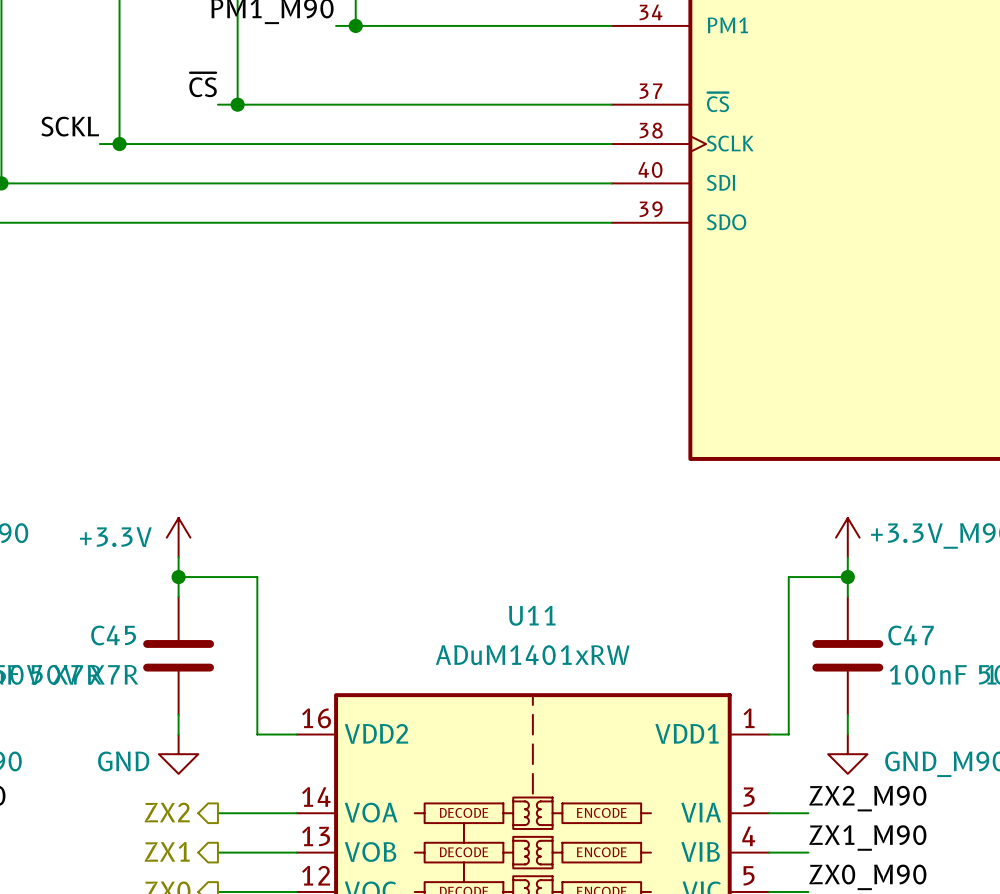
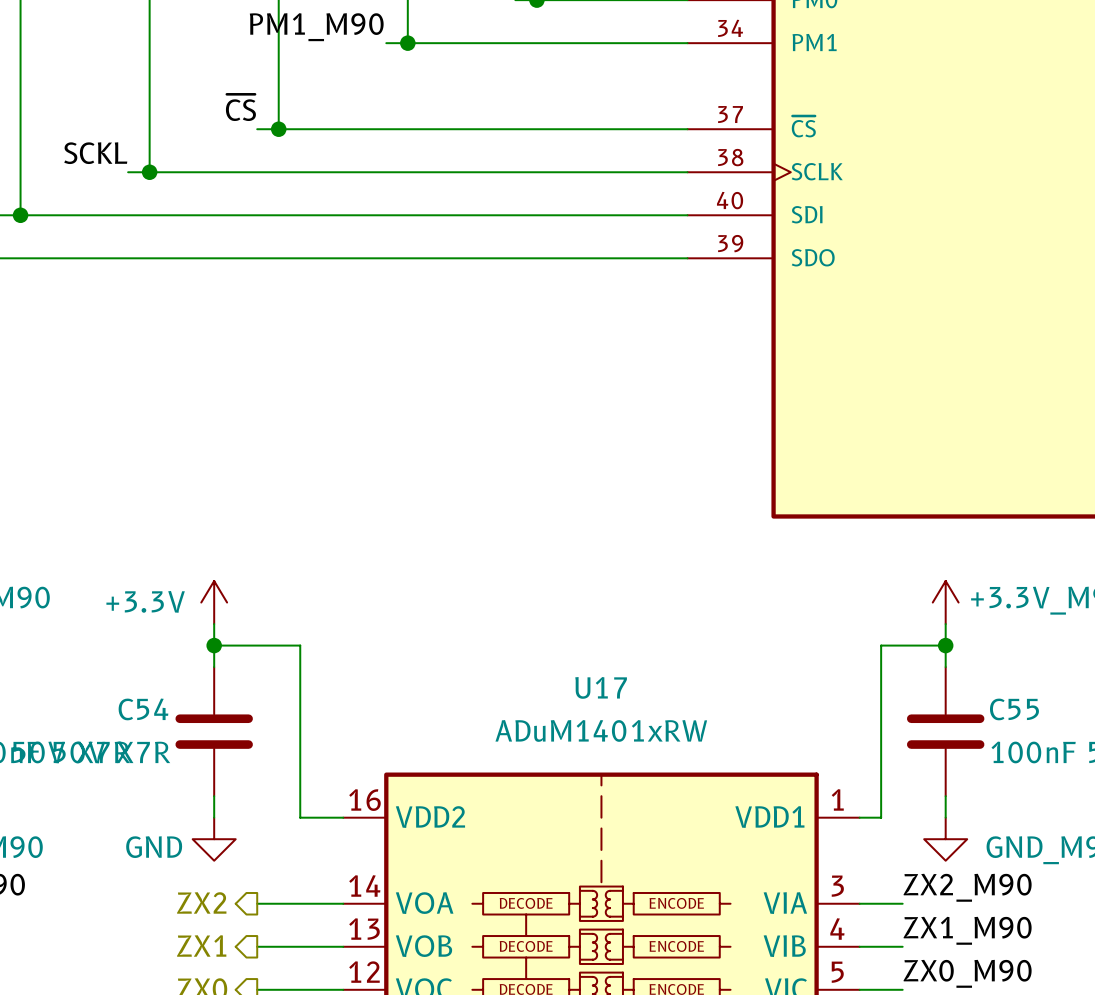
U11 name: U11 (532, 615) -> U17 (601, 687)
C45 name: C45 (113, 635) -> C54 (143, 709)
C47 name: C47 (911, 635) -> C55 (1014, 709)

